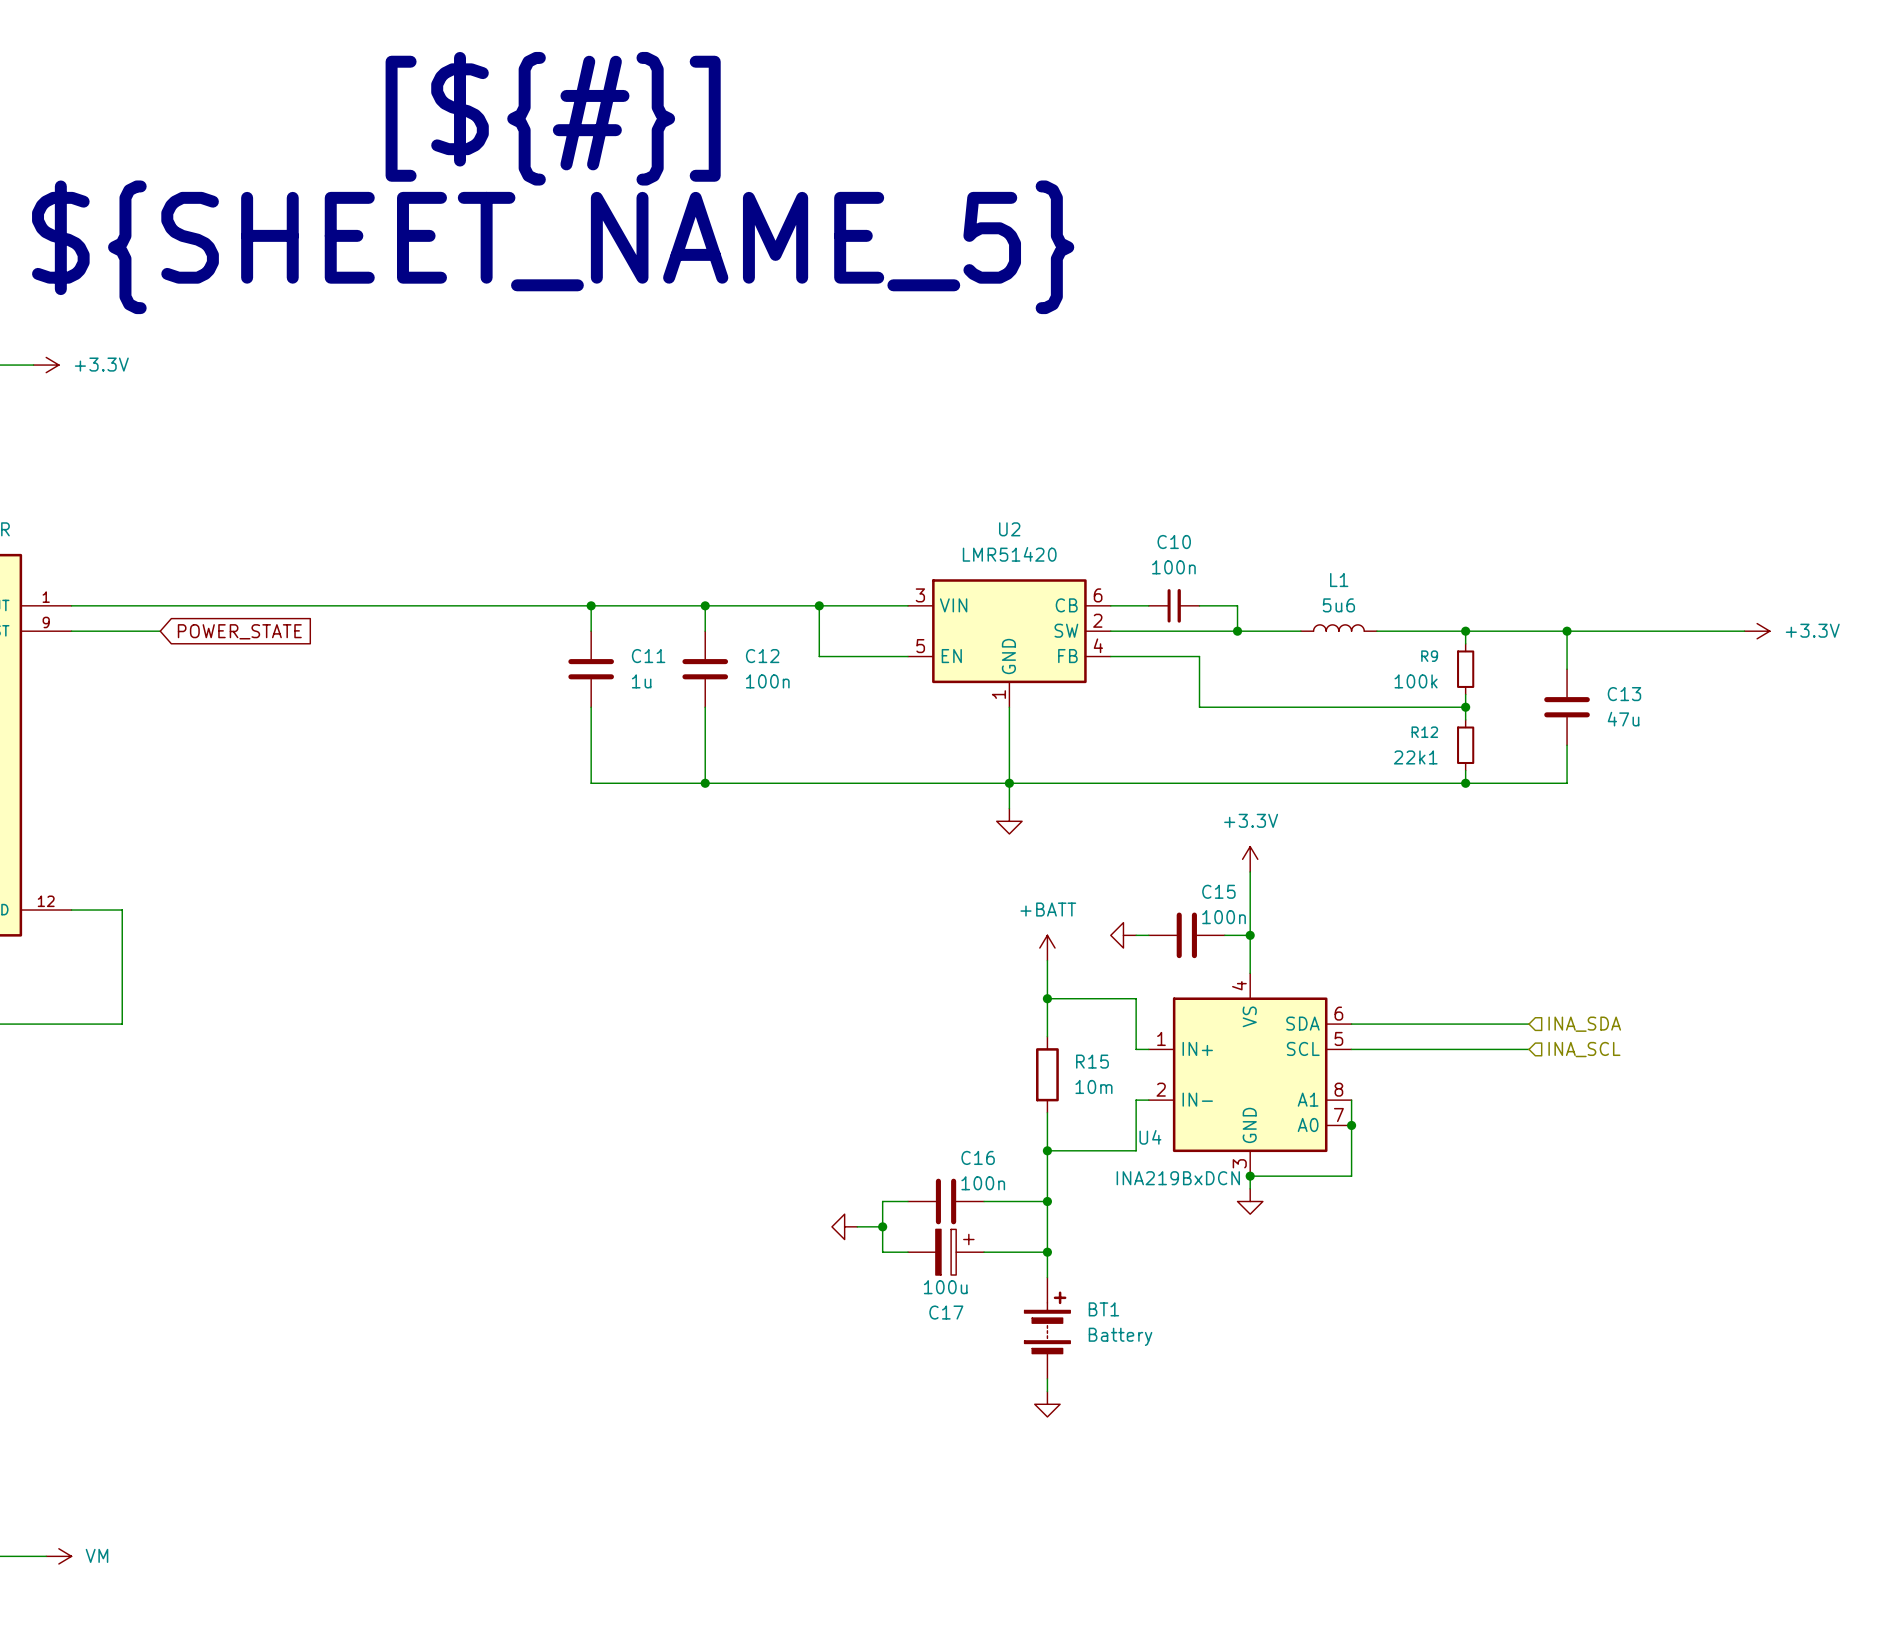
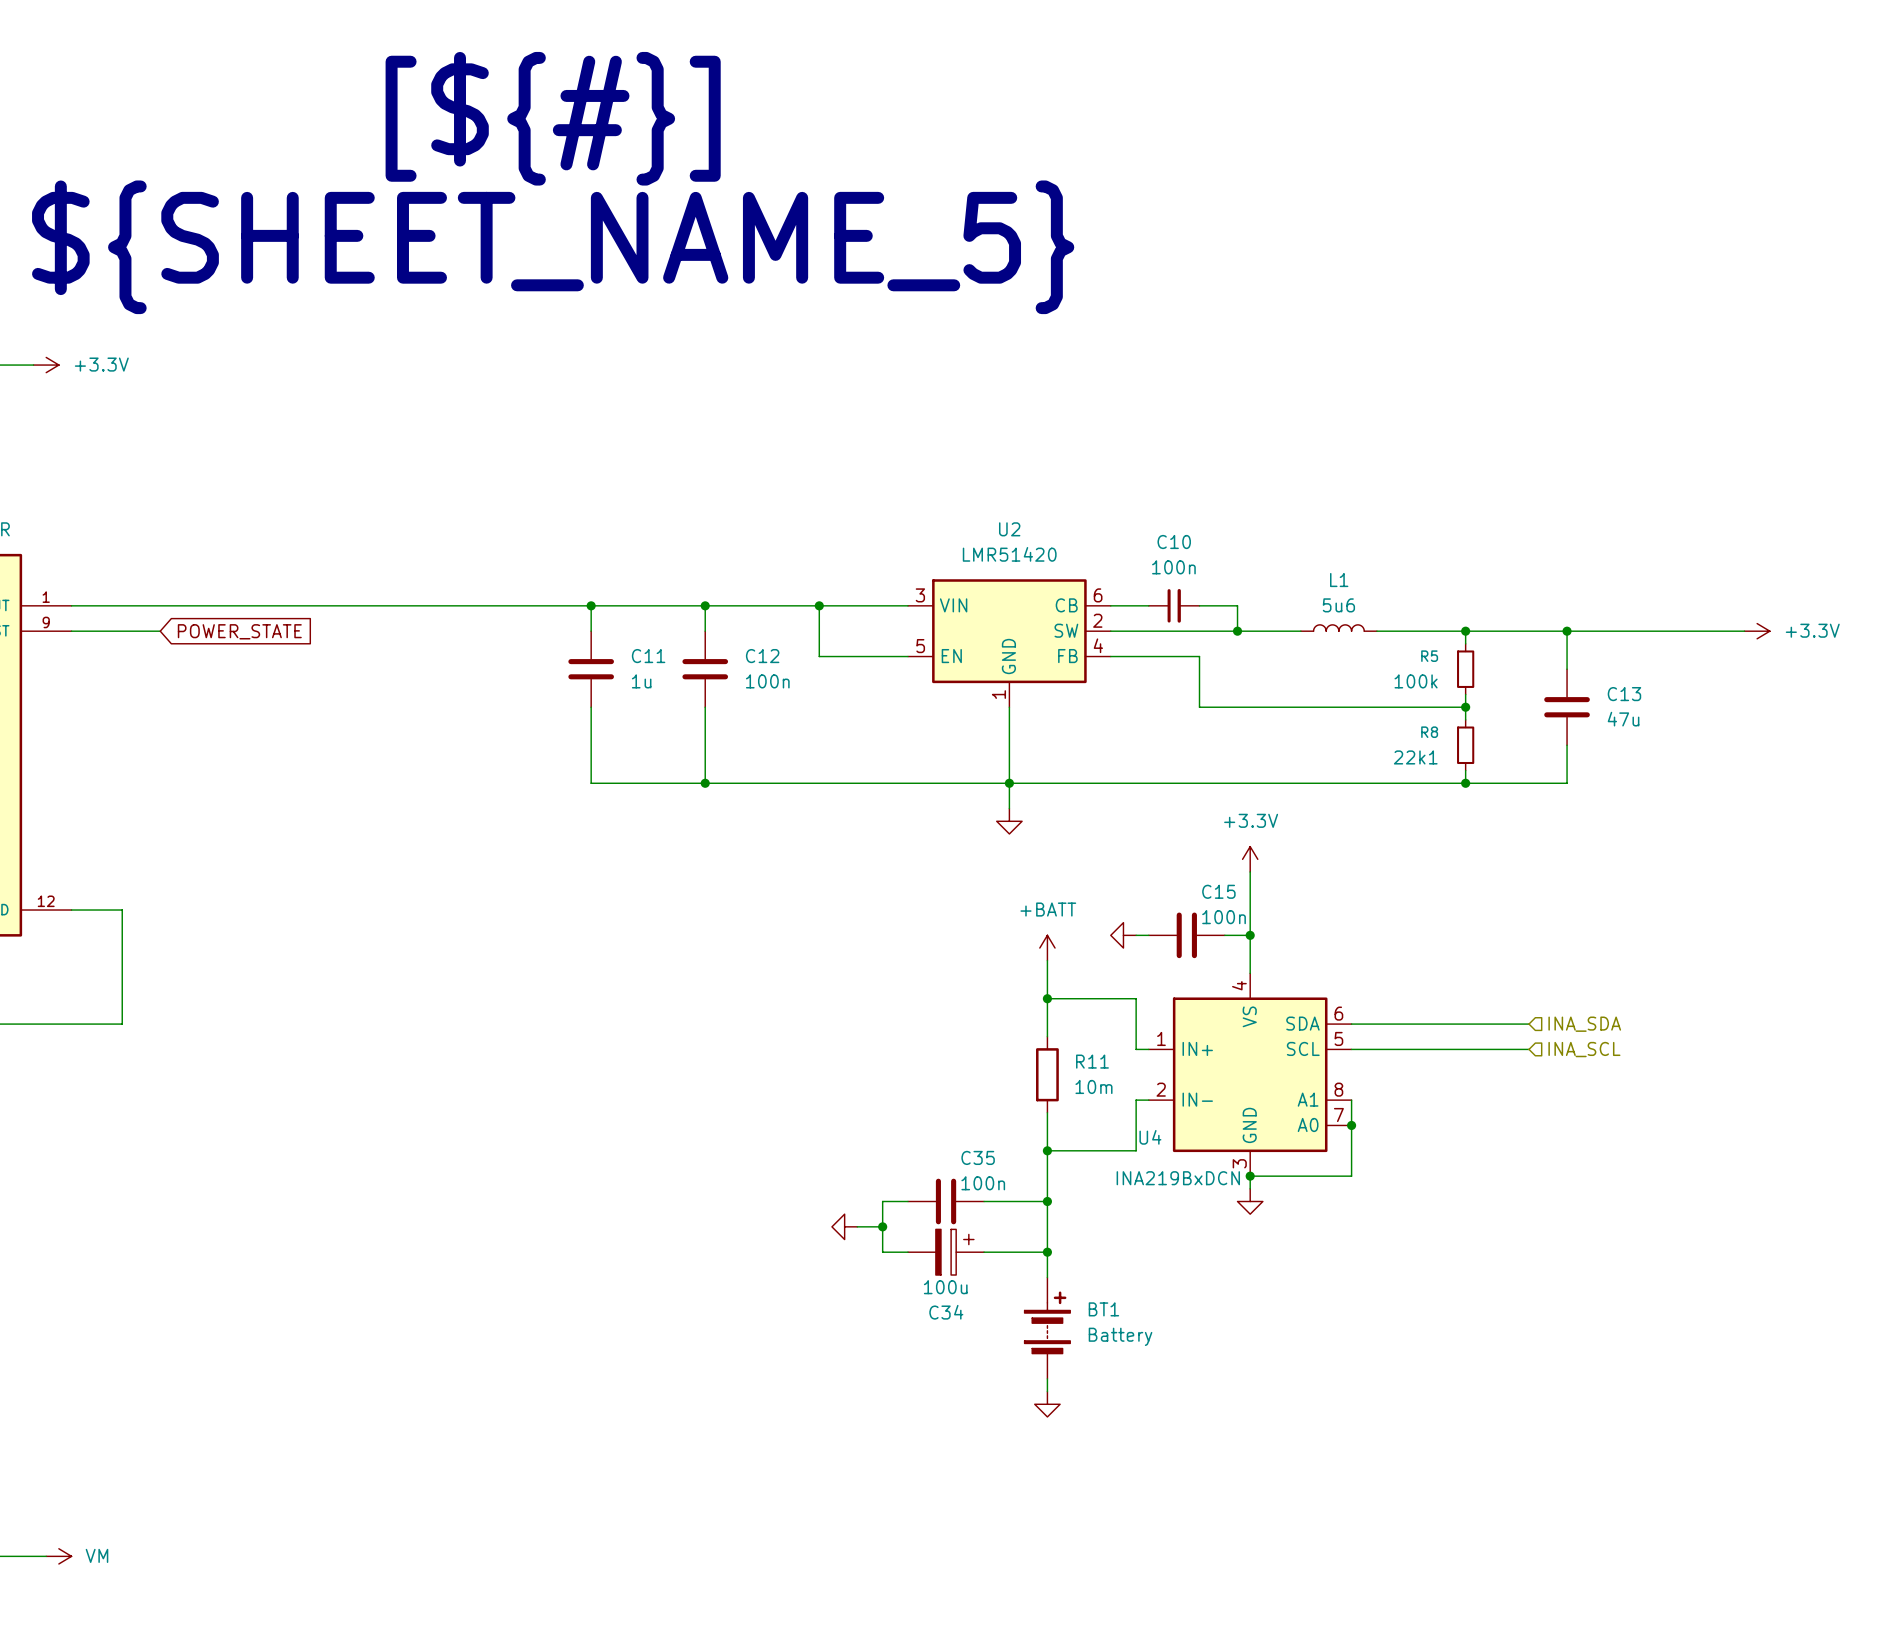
R9 name: R9 (1429, 656) -> R5 (1429, 656)
R12 name: R12 (1424, 732) -> R8 (1429, 732)
R15 name: R15 (1092, 1061) -> R11 (1092, 1061)
C16 name: C16 (978, 1157) -> C35 (978, 1157)
C17 name: C17 (946, 1312) -> C34 (946, 1312)

